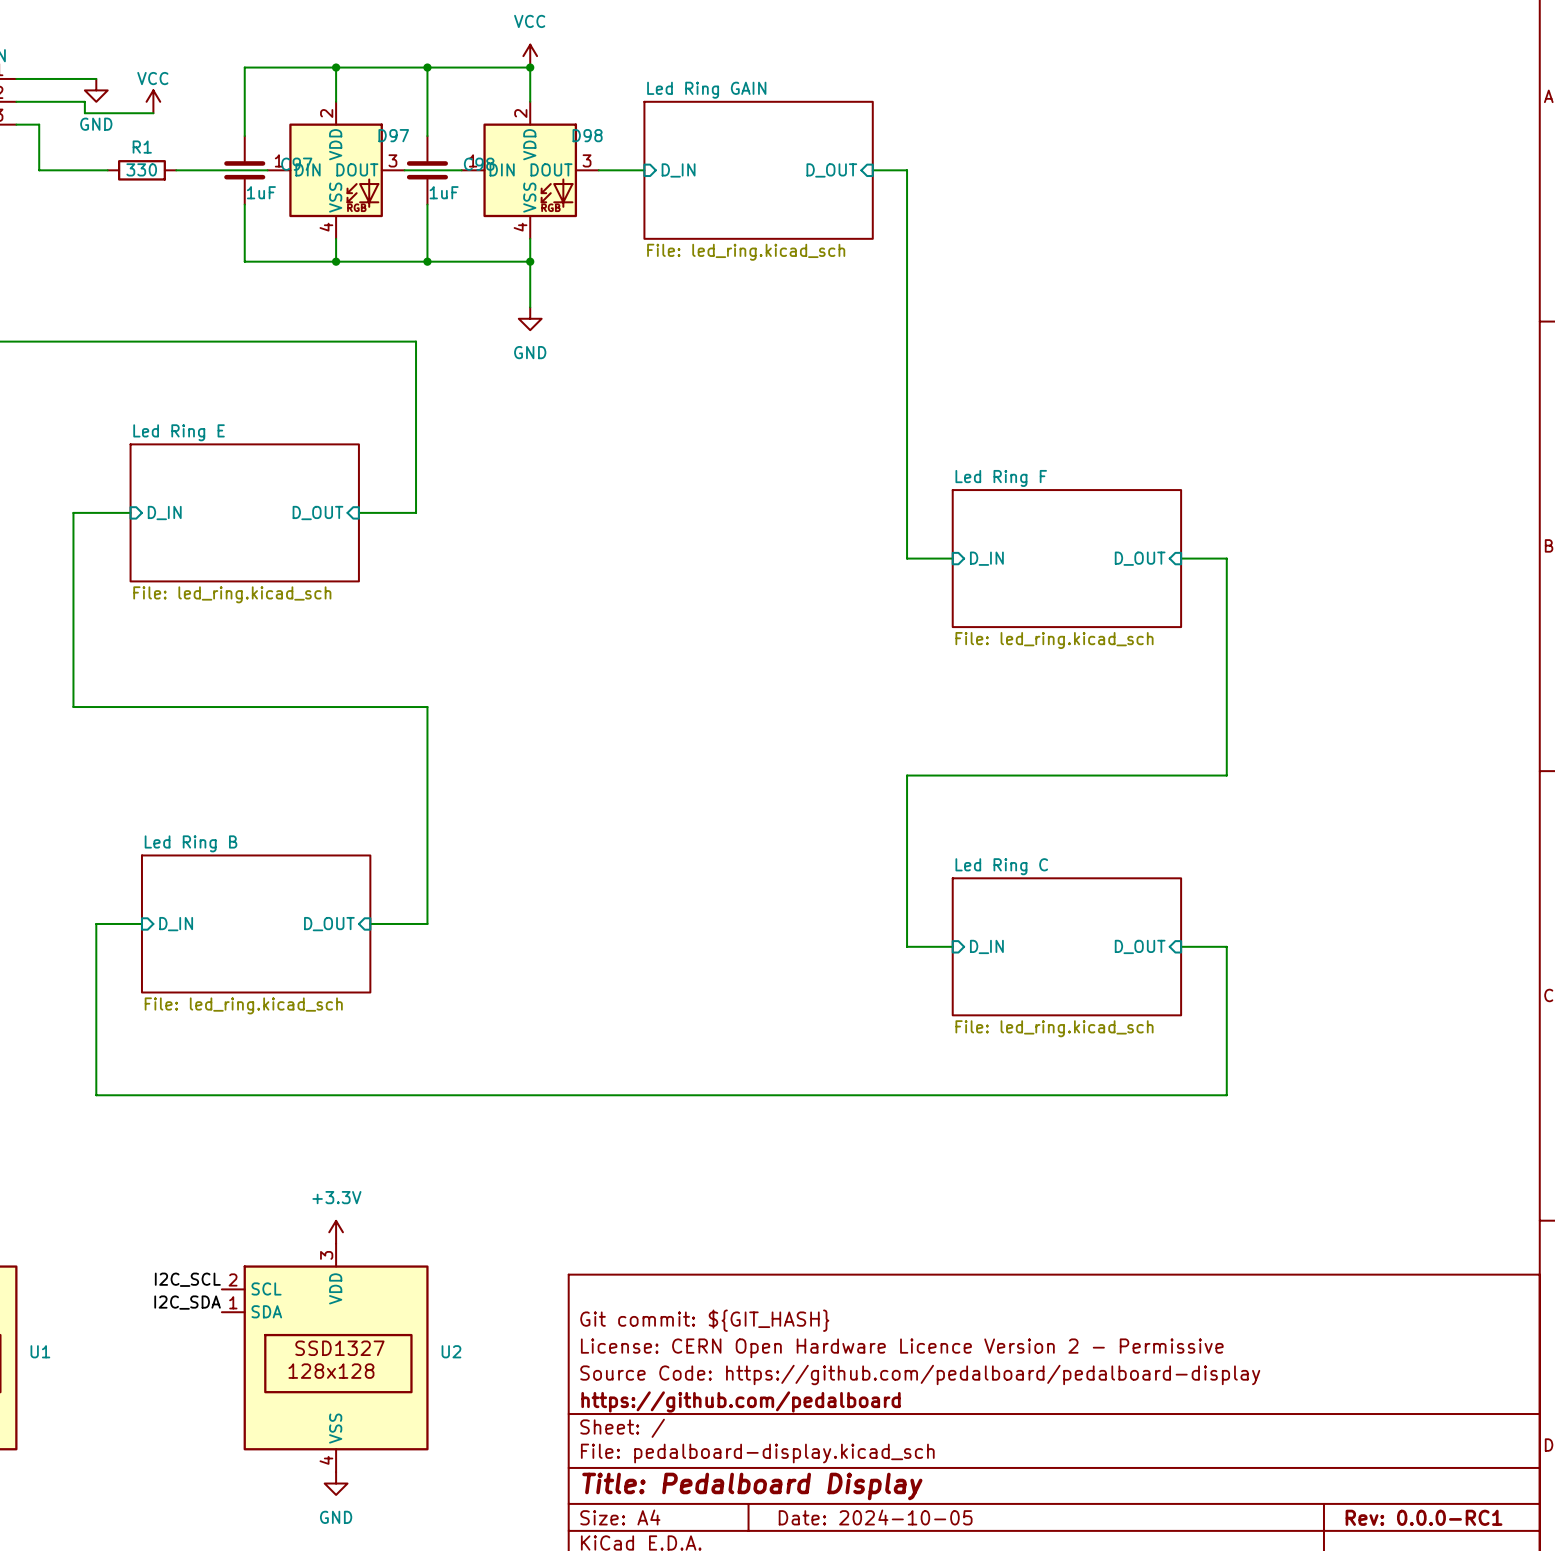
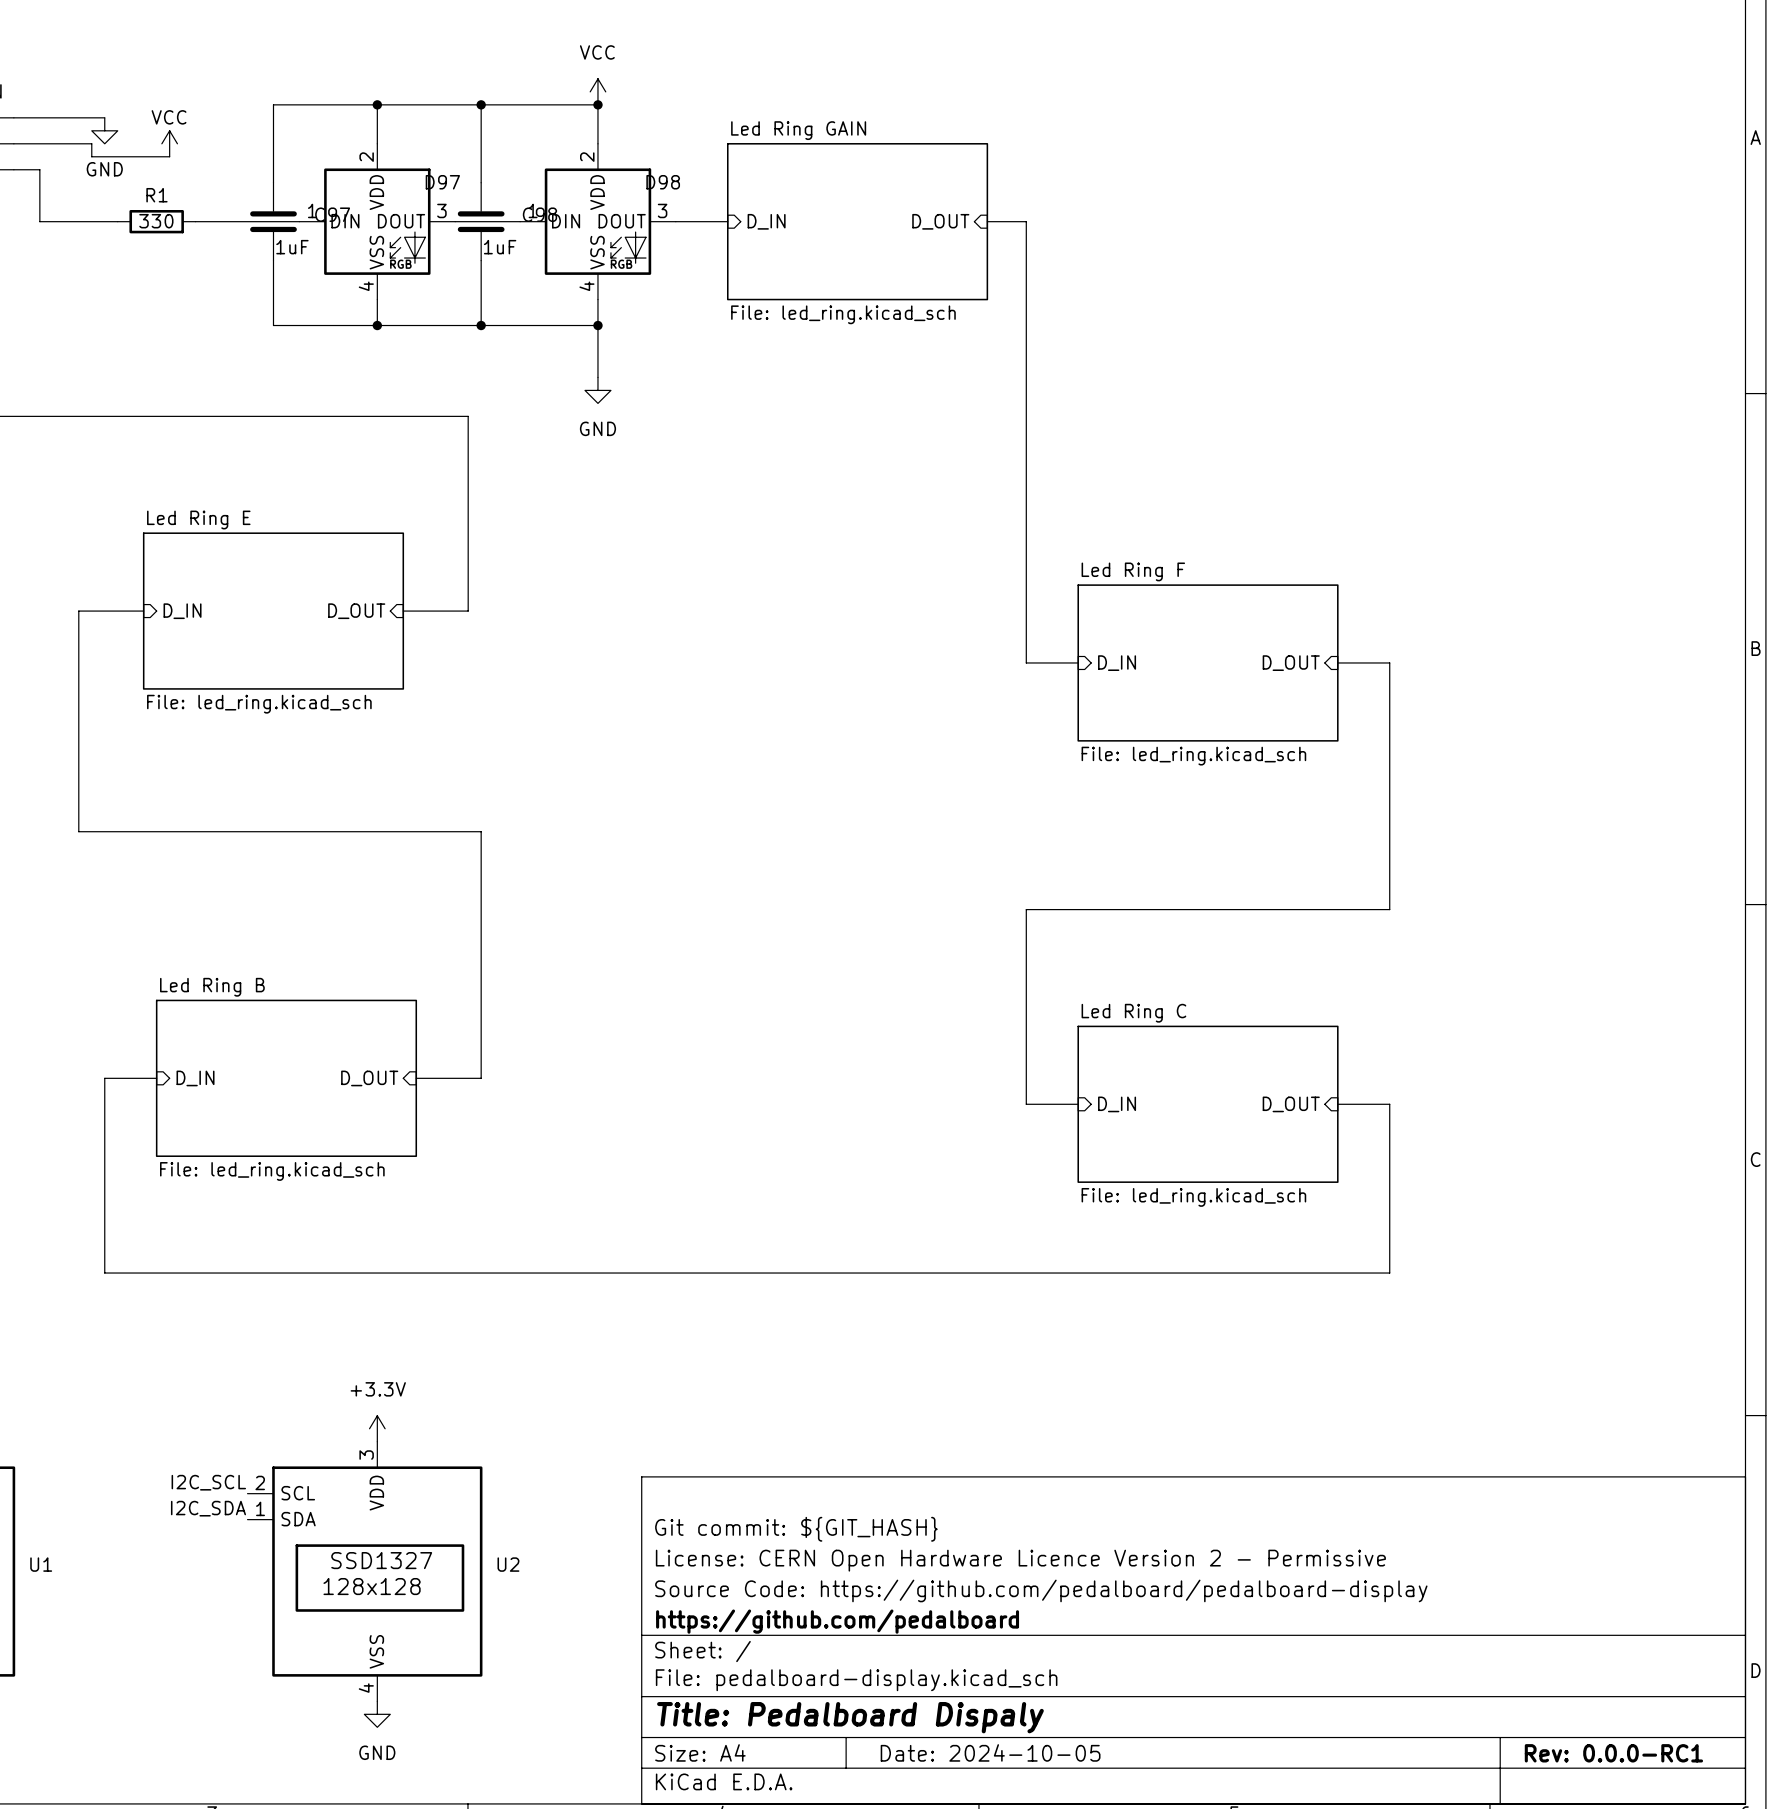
title block: Title: Pedalboard Display (752, 1486) -> Title: Pedalboard Dispaly (850, 1717)

